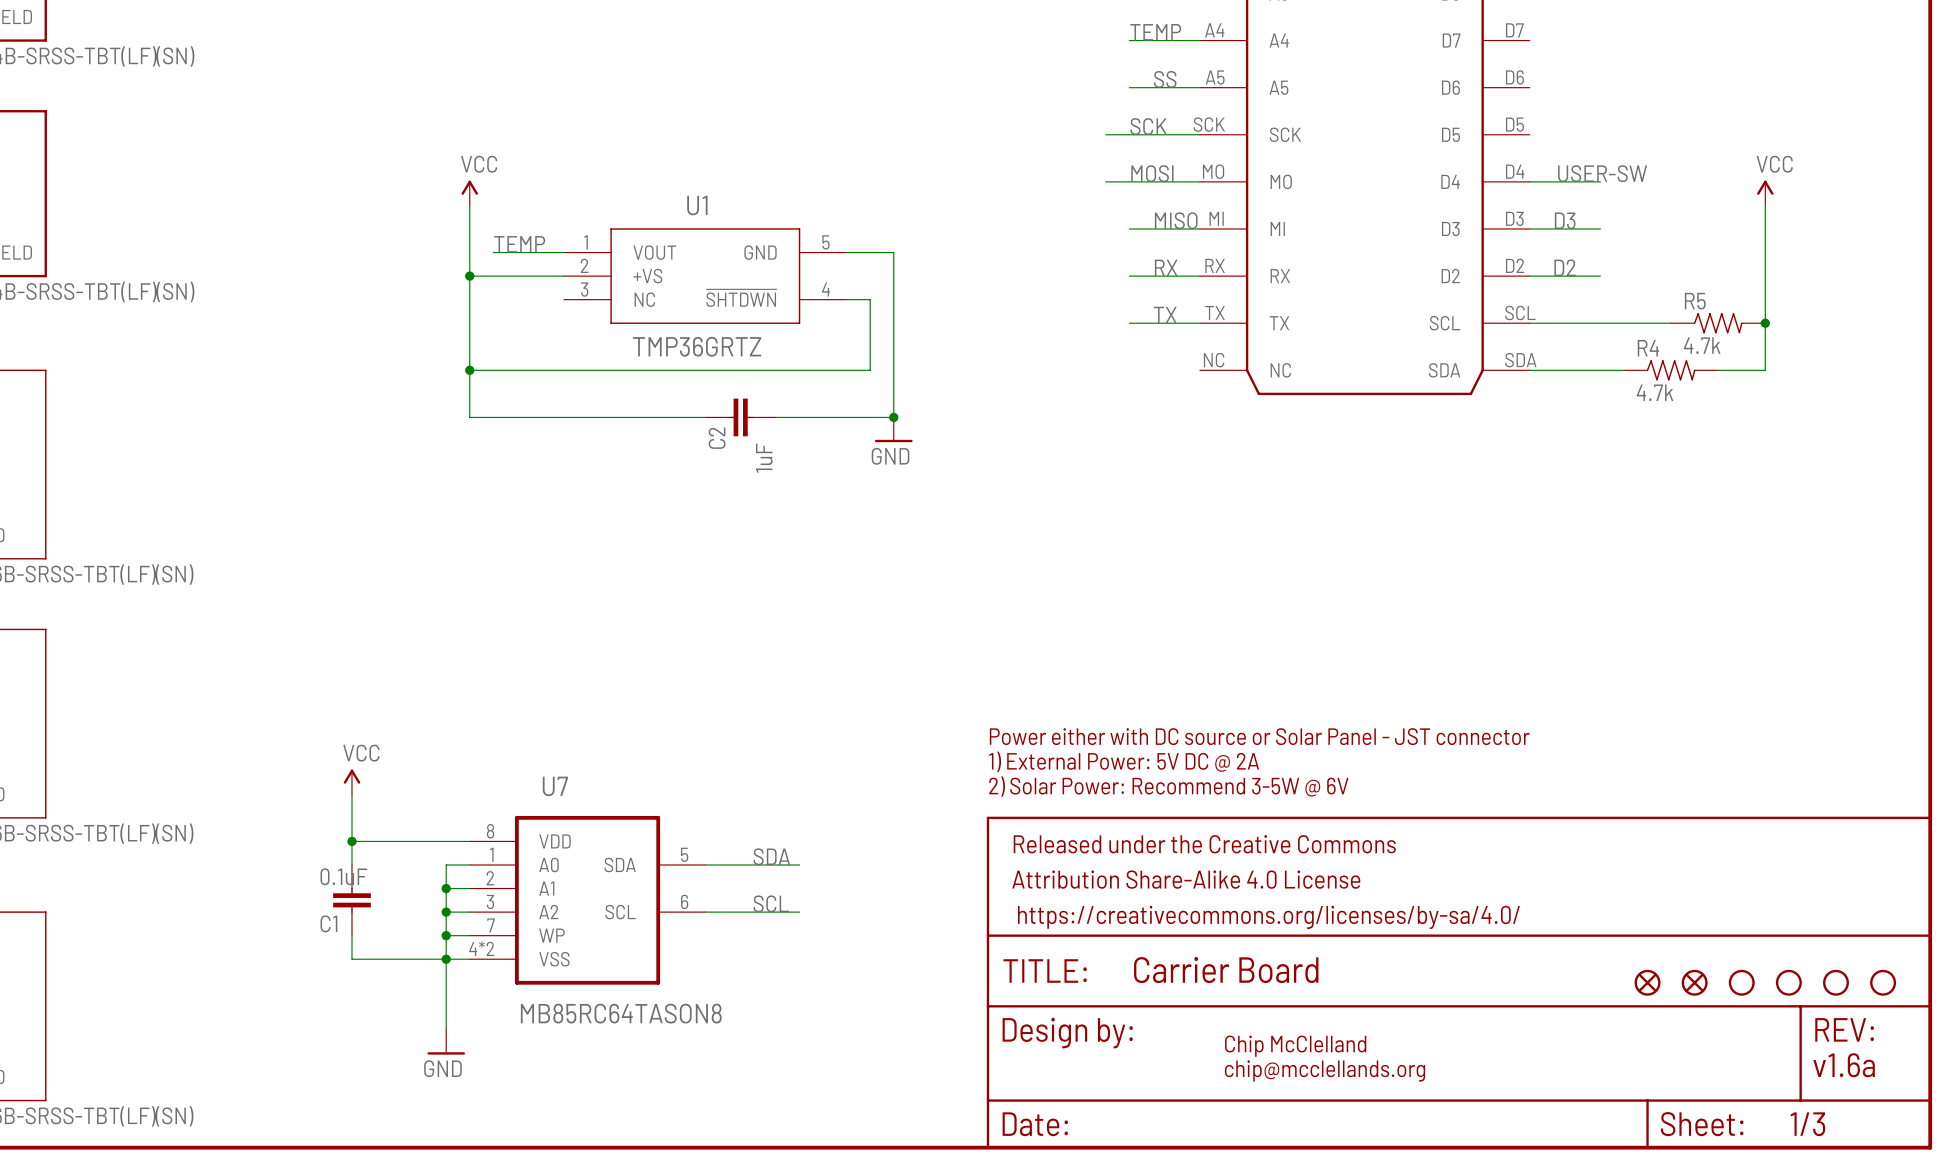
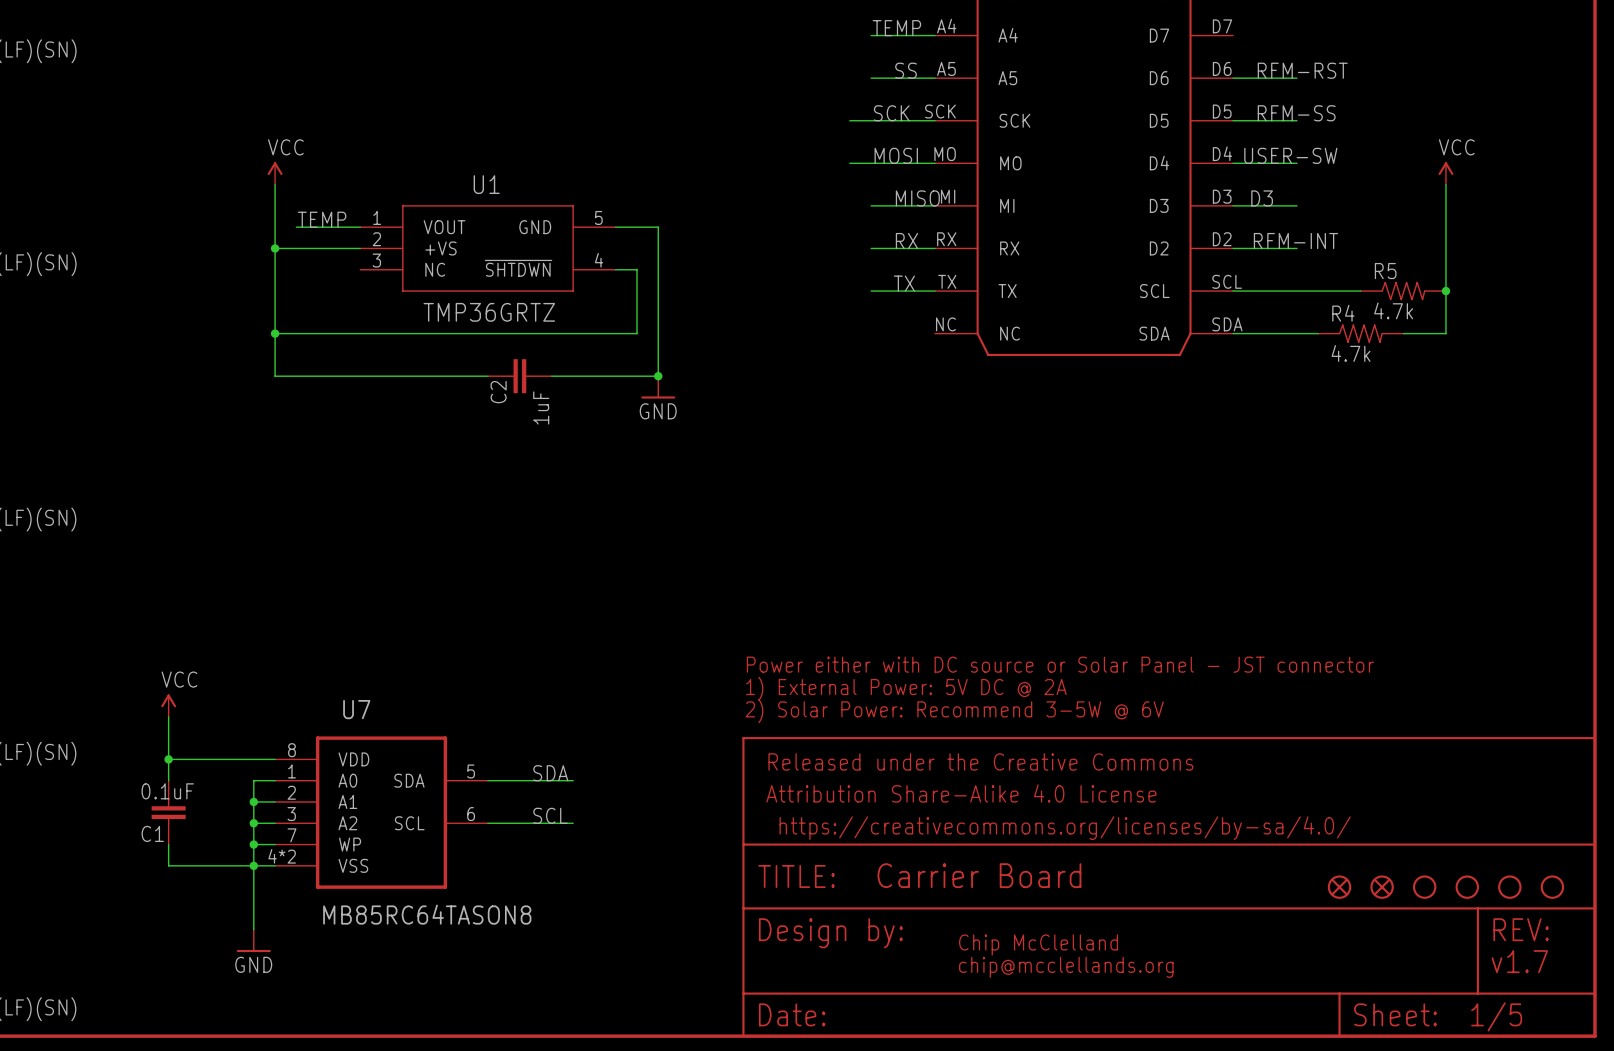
label: none -> RFM-RST (1302, 70)
wire: none -> (1233, 78) (1296, 78)
label: none -> RFM-SS (1296, 113)
wire: none -> (1233, 120) (1296, 120)
label: D2 (1565, 267) -> none
label: none -> RFM-INT (1295, 241)
text: v1.6a (1844, 1065) -> v1.7 (1519, 961)
part text: 1/3 (1807, 1124) -> 1/5 (1496, 1016)

